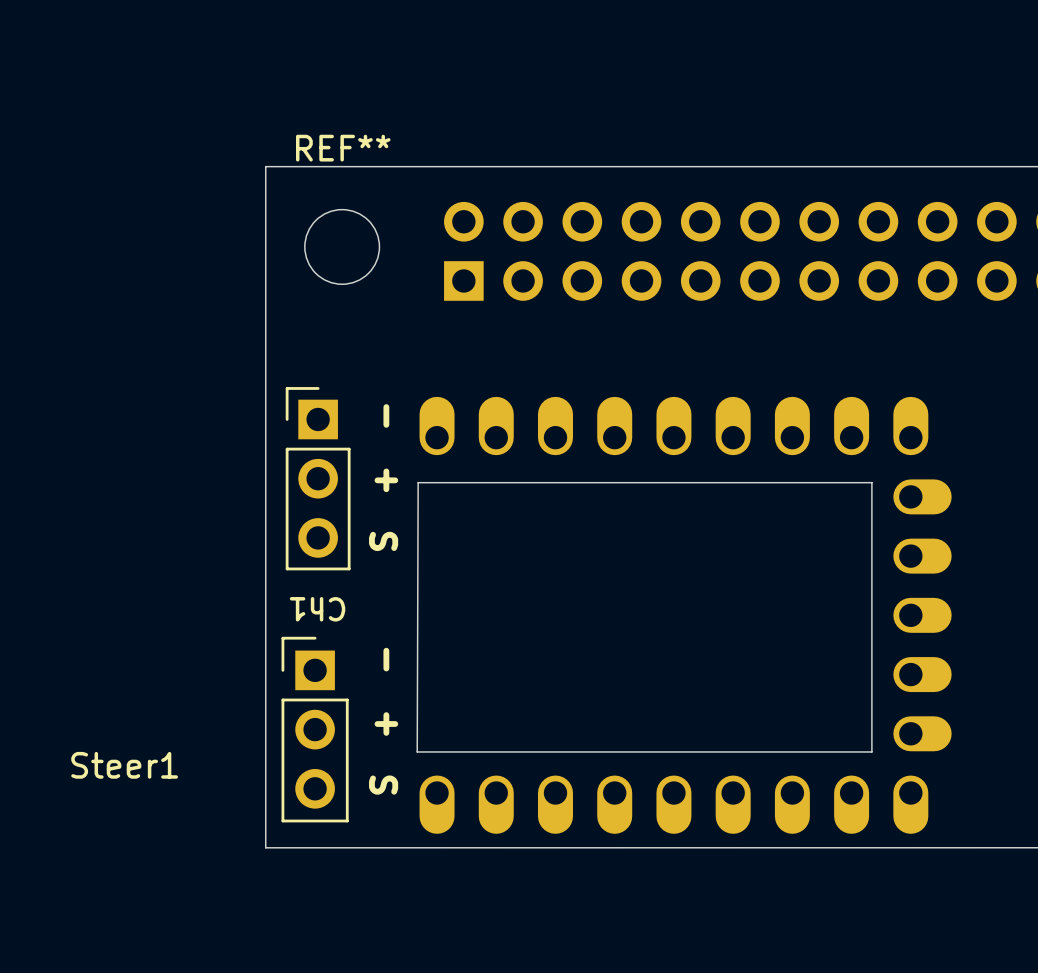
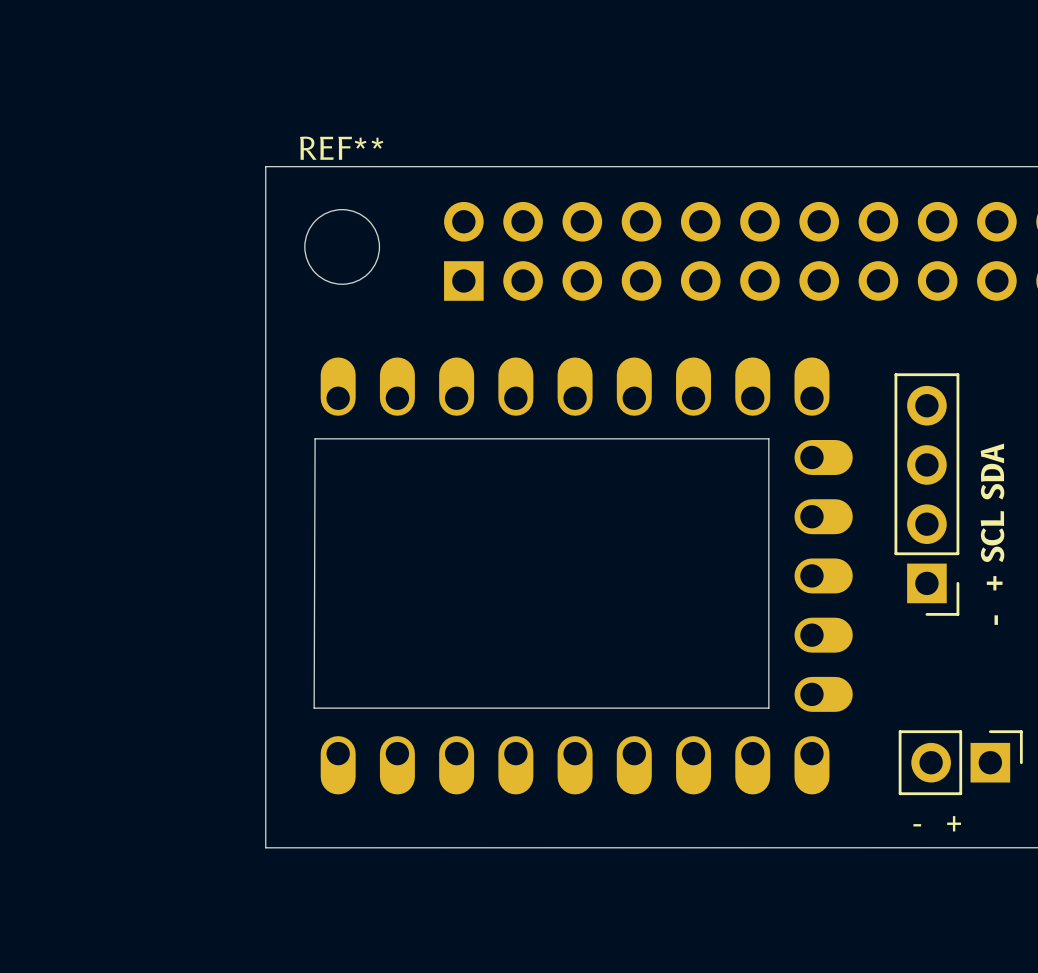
text: S + - (383, 477) -> none
part: (318, 478) -> none
board edge: (418, 482) (417, 751) (871, 751) (871, 482) (418, 482) -> (315, 438) (314, 708) (768, 708) (768, 438) (315, 438)
text: none -> - + SCL SDA (992, 534)
part: none -> (926, 494)
text: Ch1 (317, 609) -> none
part position: (685, 615) -> (586, 575)
text: S + - (383, 721) -> none
Steer1: (315, 729) -> none
part: none -> (960, 762)
text: none -> - + (937, 823)

